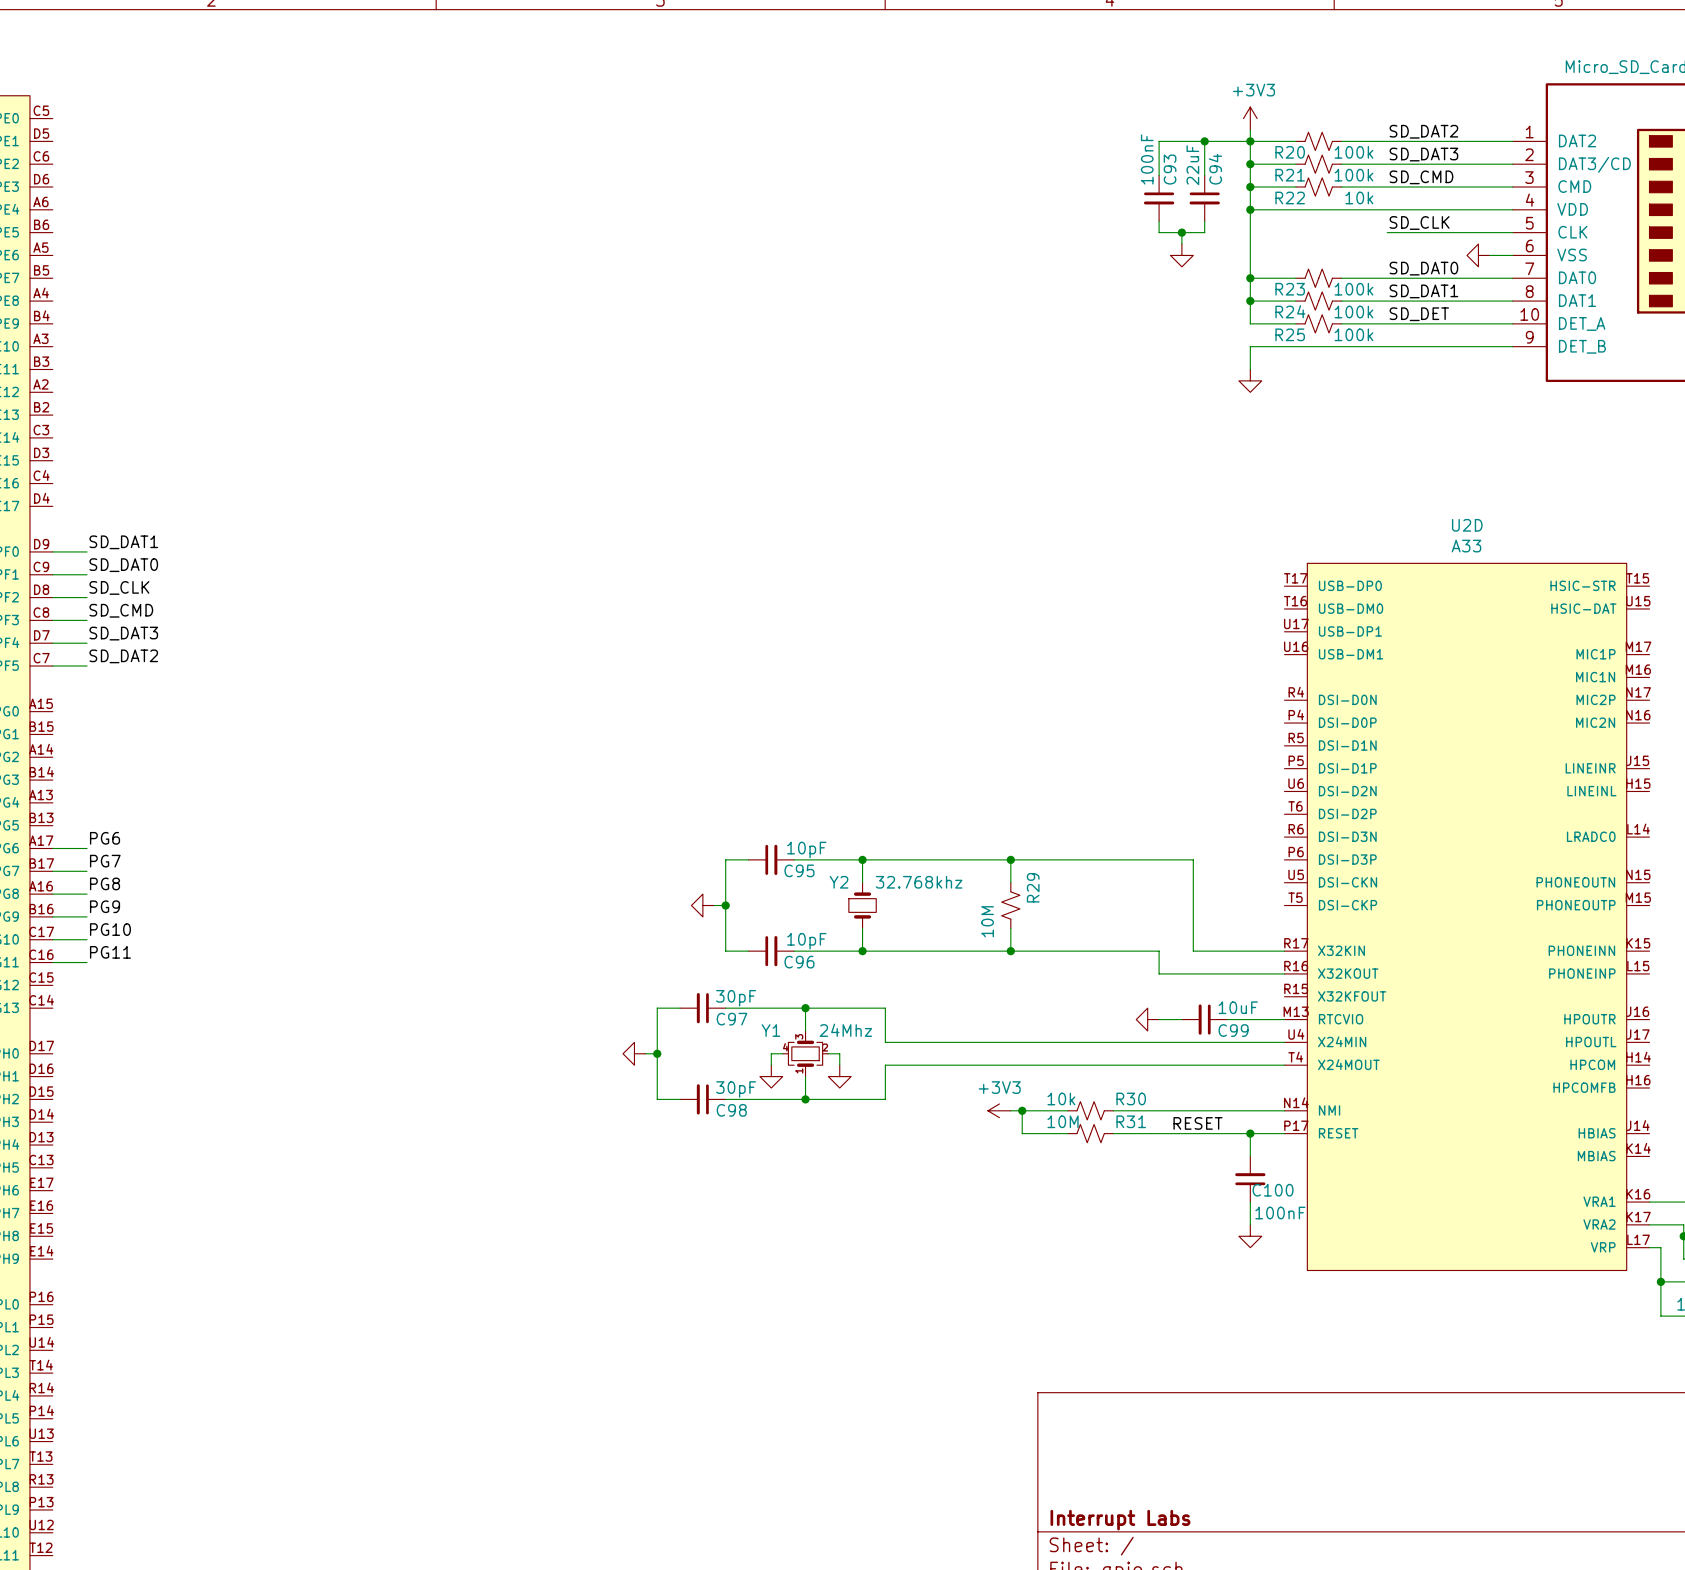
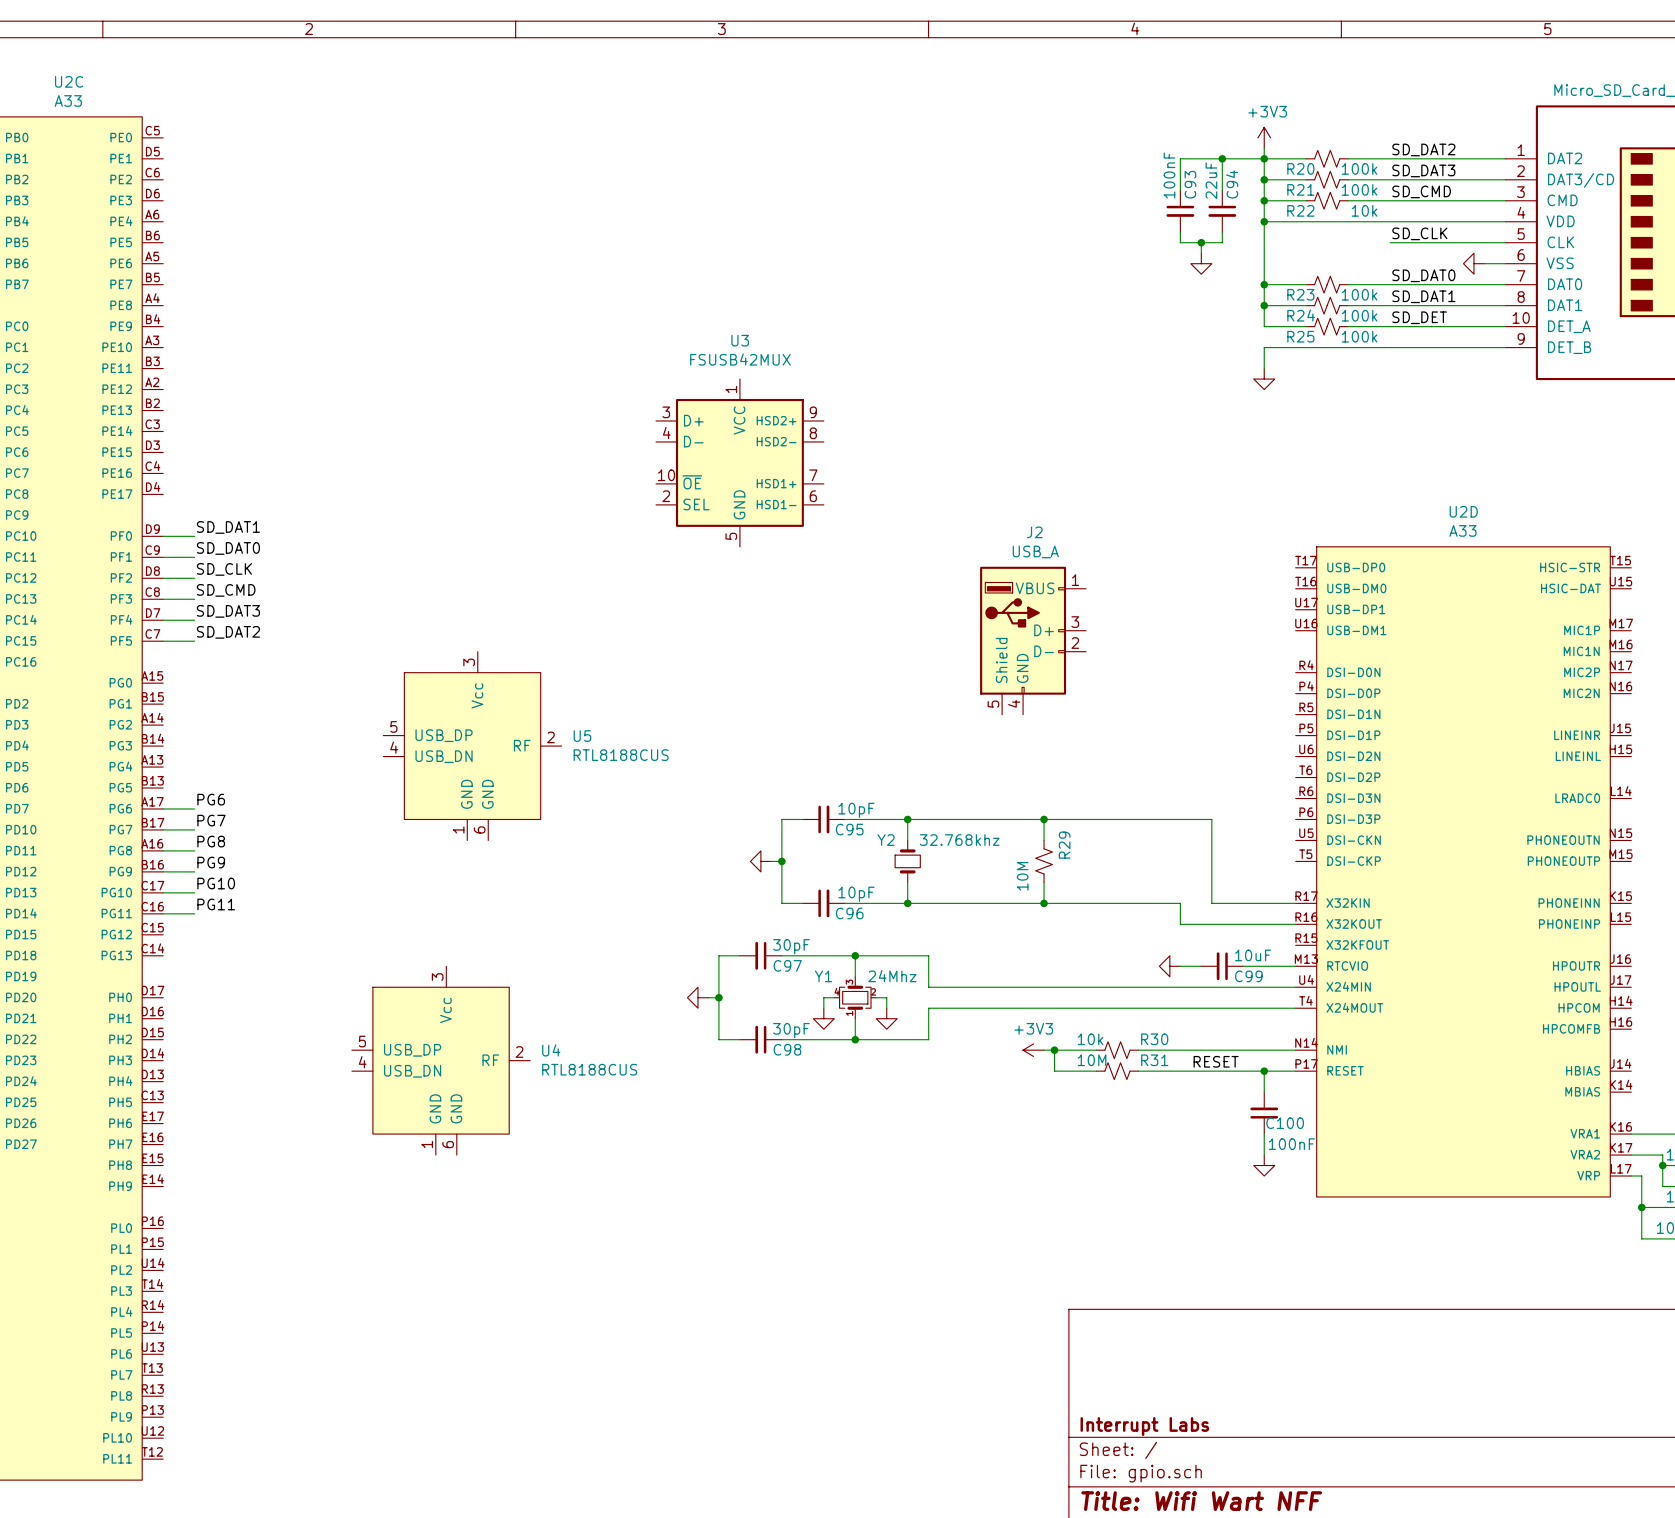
U3: none -> FSUSB42MUX (739, 462)
J2: none -> USB_A (1033, 640)
U5: none -> RTL8188CUS (472, 746)
U4: none -> RTL8188CUS (441, 1060)

